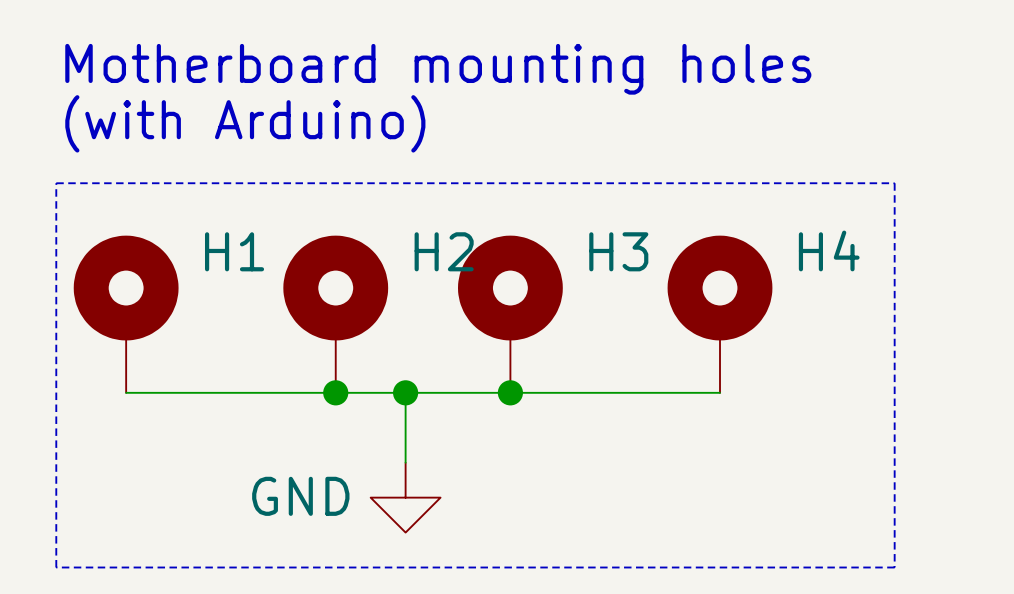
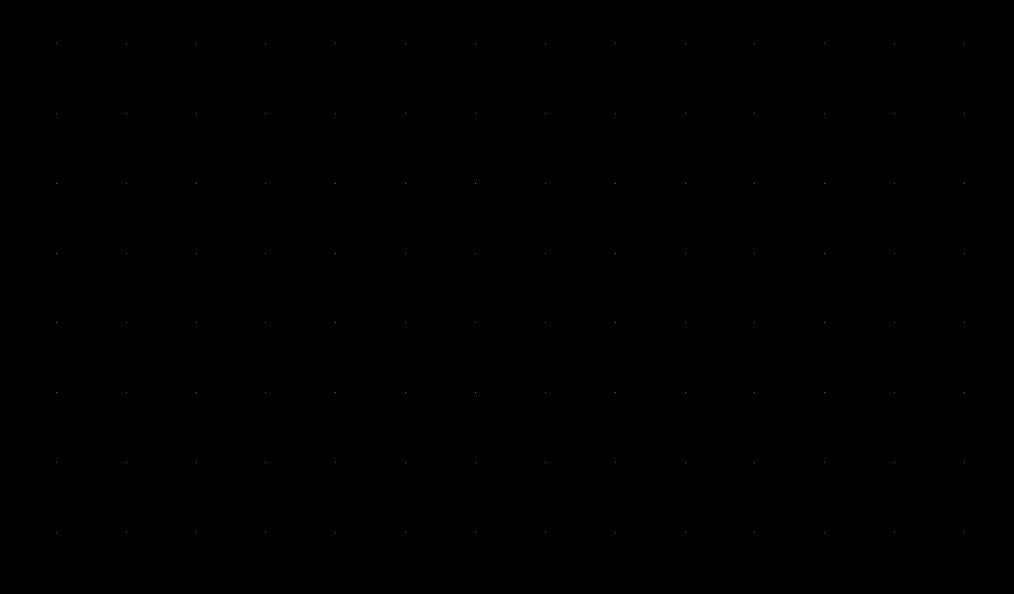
text: Motherboard mounting holes (438, 69) -> none
text: (with Arduino) (245, 123) -> none
line: (56, 183) (894, 183) (894, 567) (56, 567) (56, 183) -> none
H1: (126, 314) -> none
H2: (335, 314) -> none
H3: (510, 314) -> none
H4: (720, 314) -> none
wire: (126, 392) (720, 392) -> none
junction: (335, 392) -> none
wire: (405, 392) (405, 462) -> none
junction: (405, 392) -> none
junction: (510, 392) -> none
power symbol: GND (405, 497) -> none

